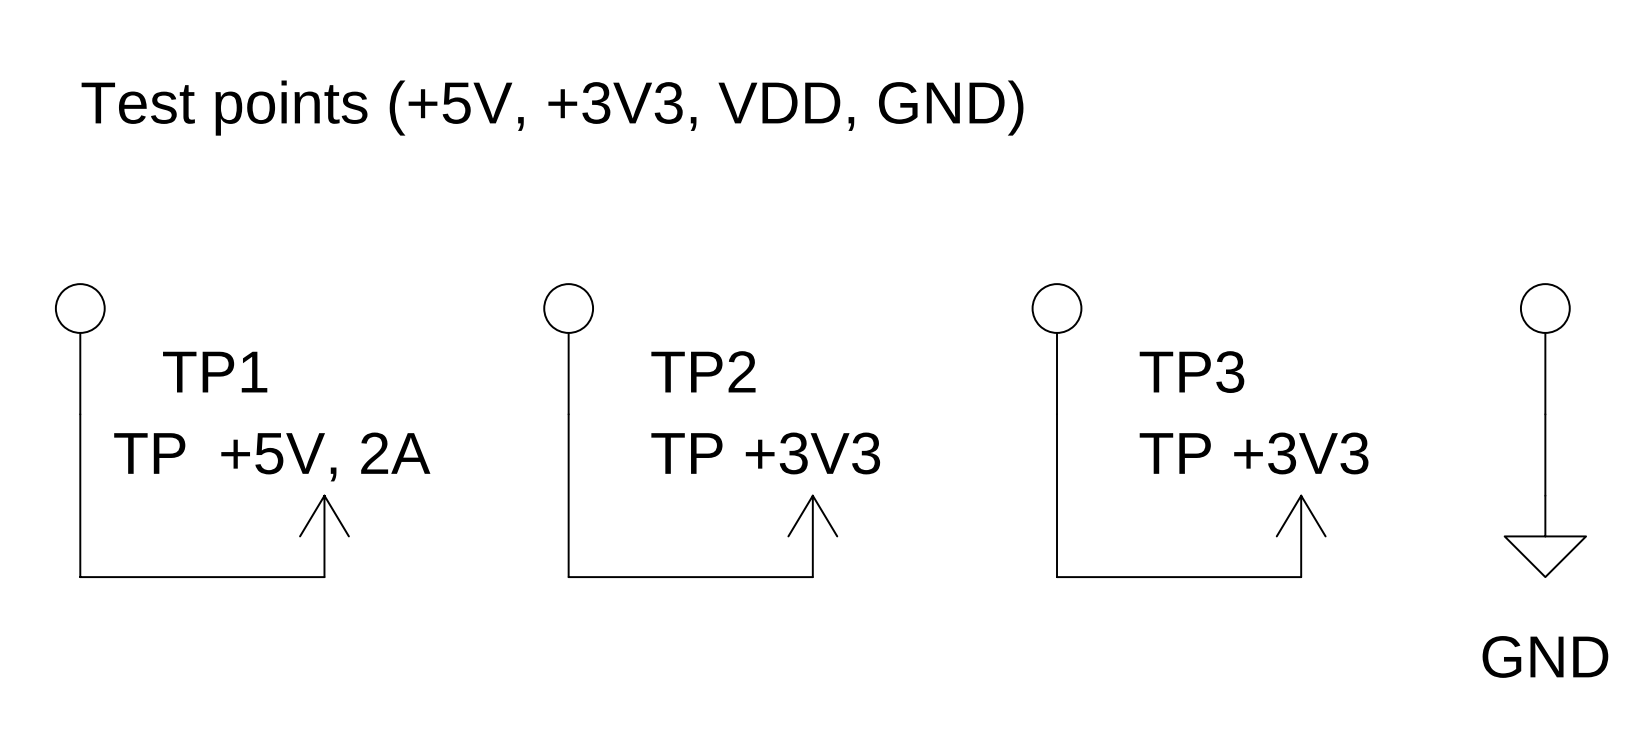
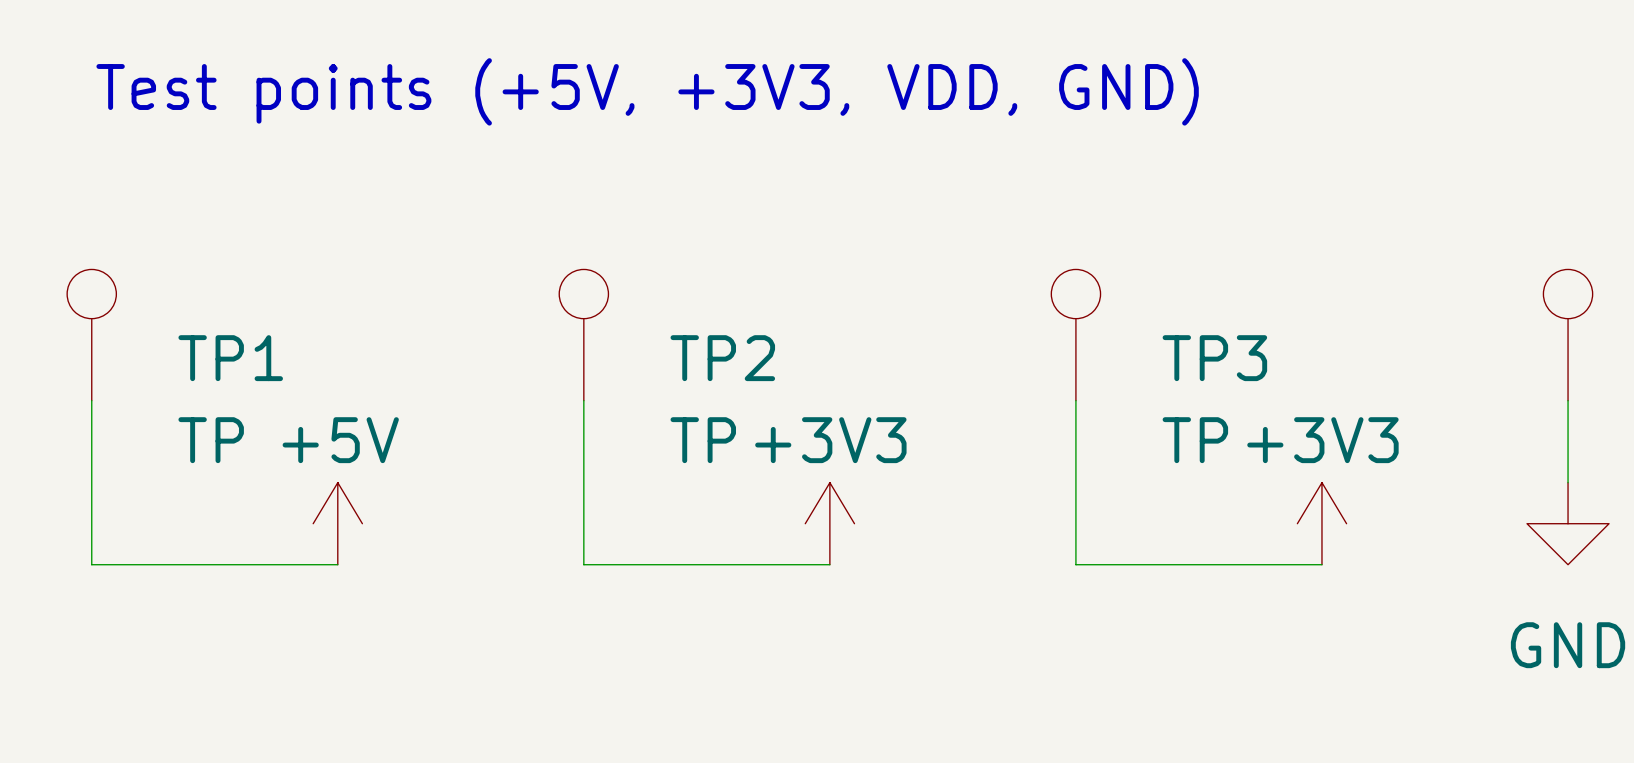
TP1 value position: TP (149, 453) -> TP (211, 440)
power symbol: +5V, 2A (324, 536) -> +5V (337, 523)

